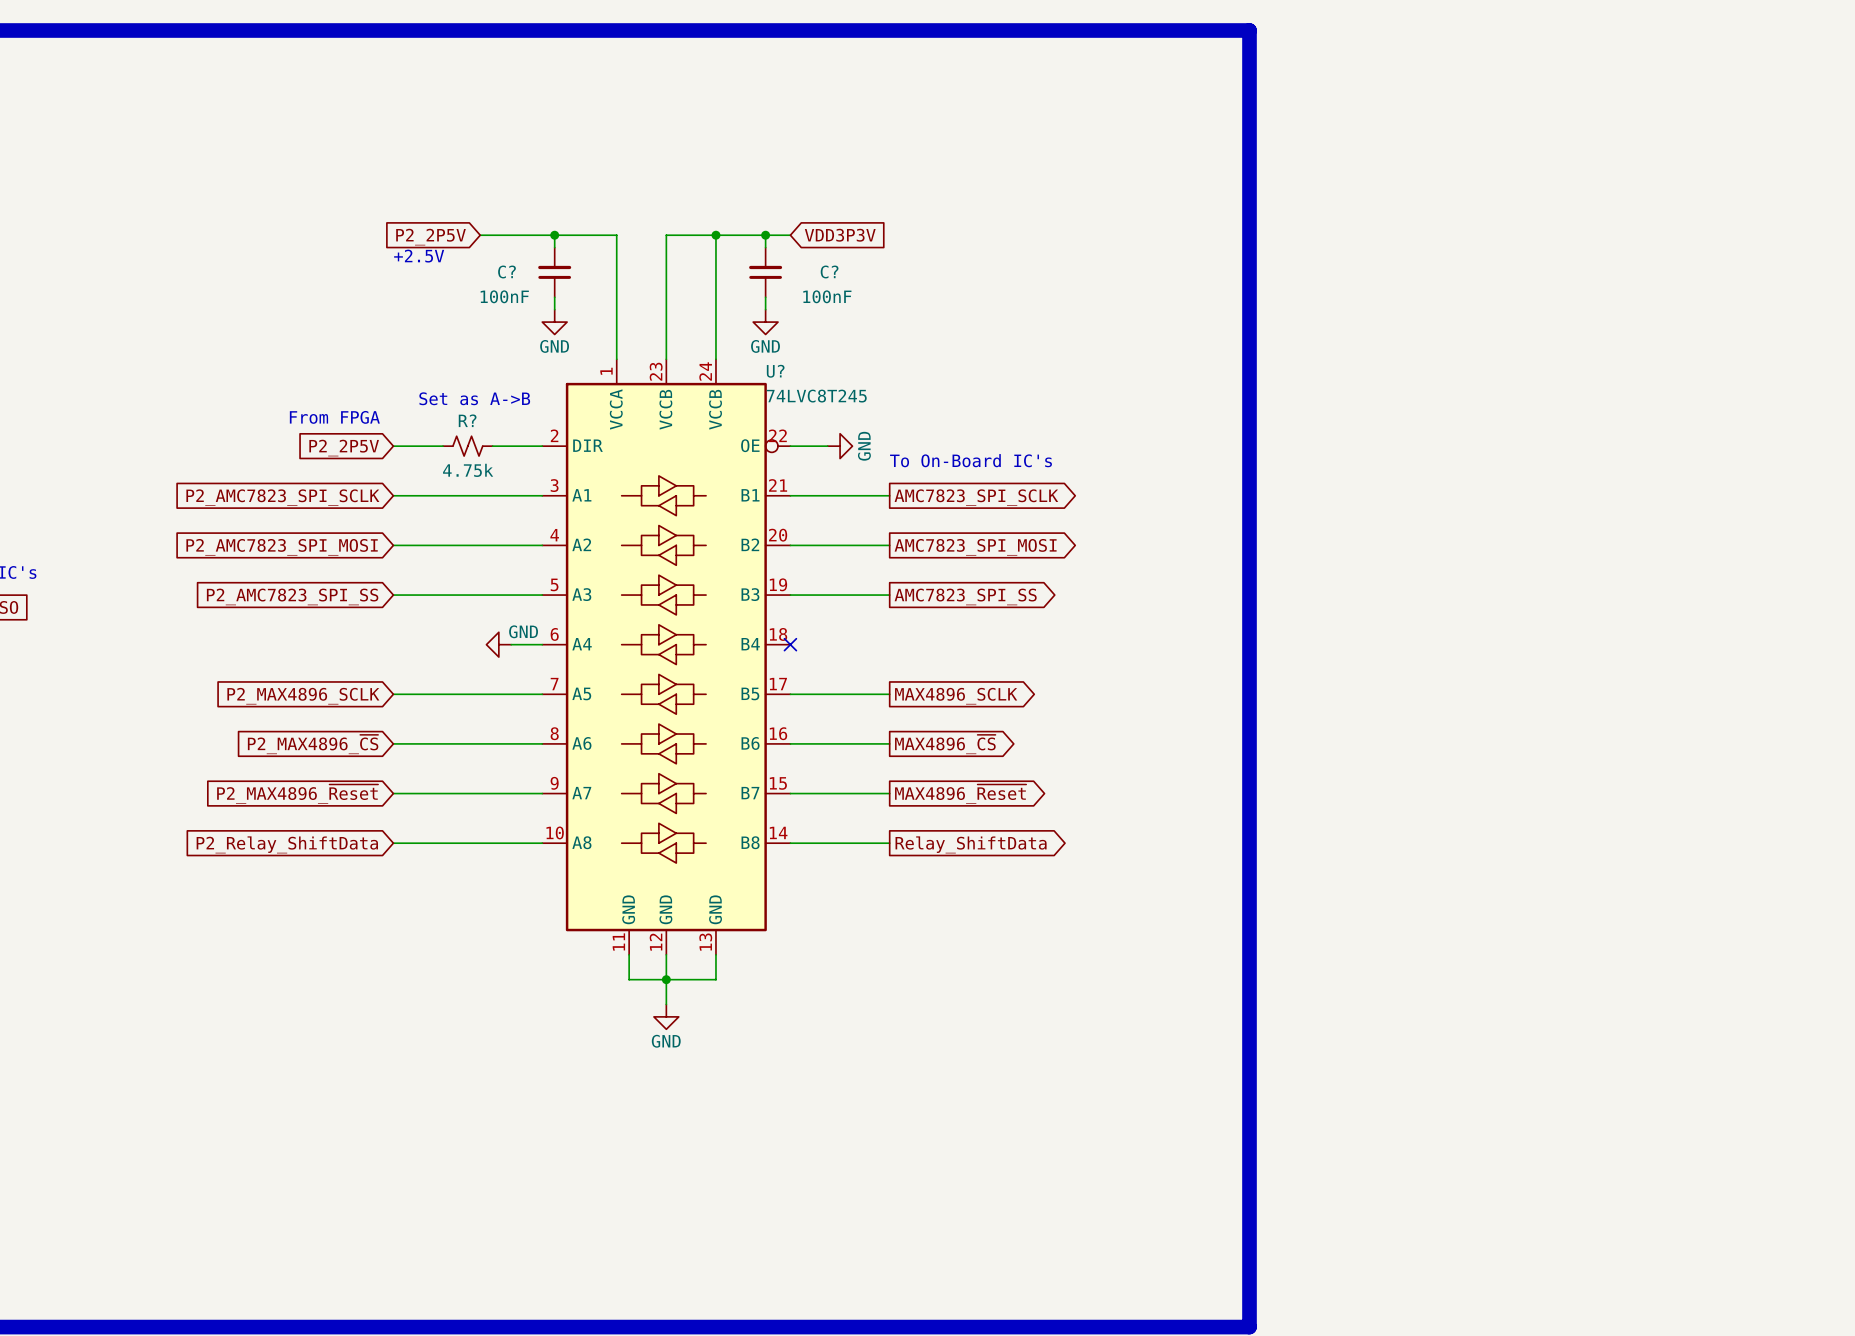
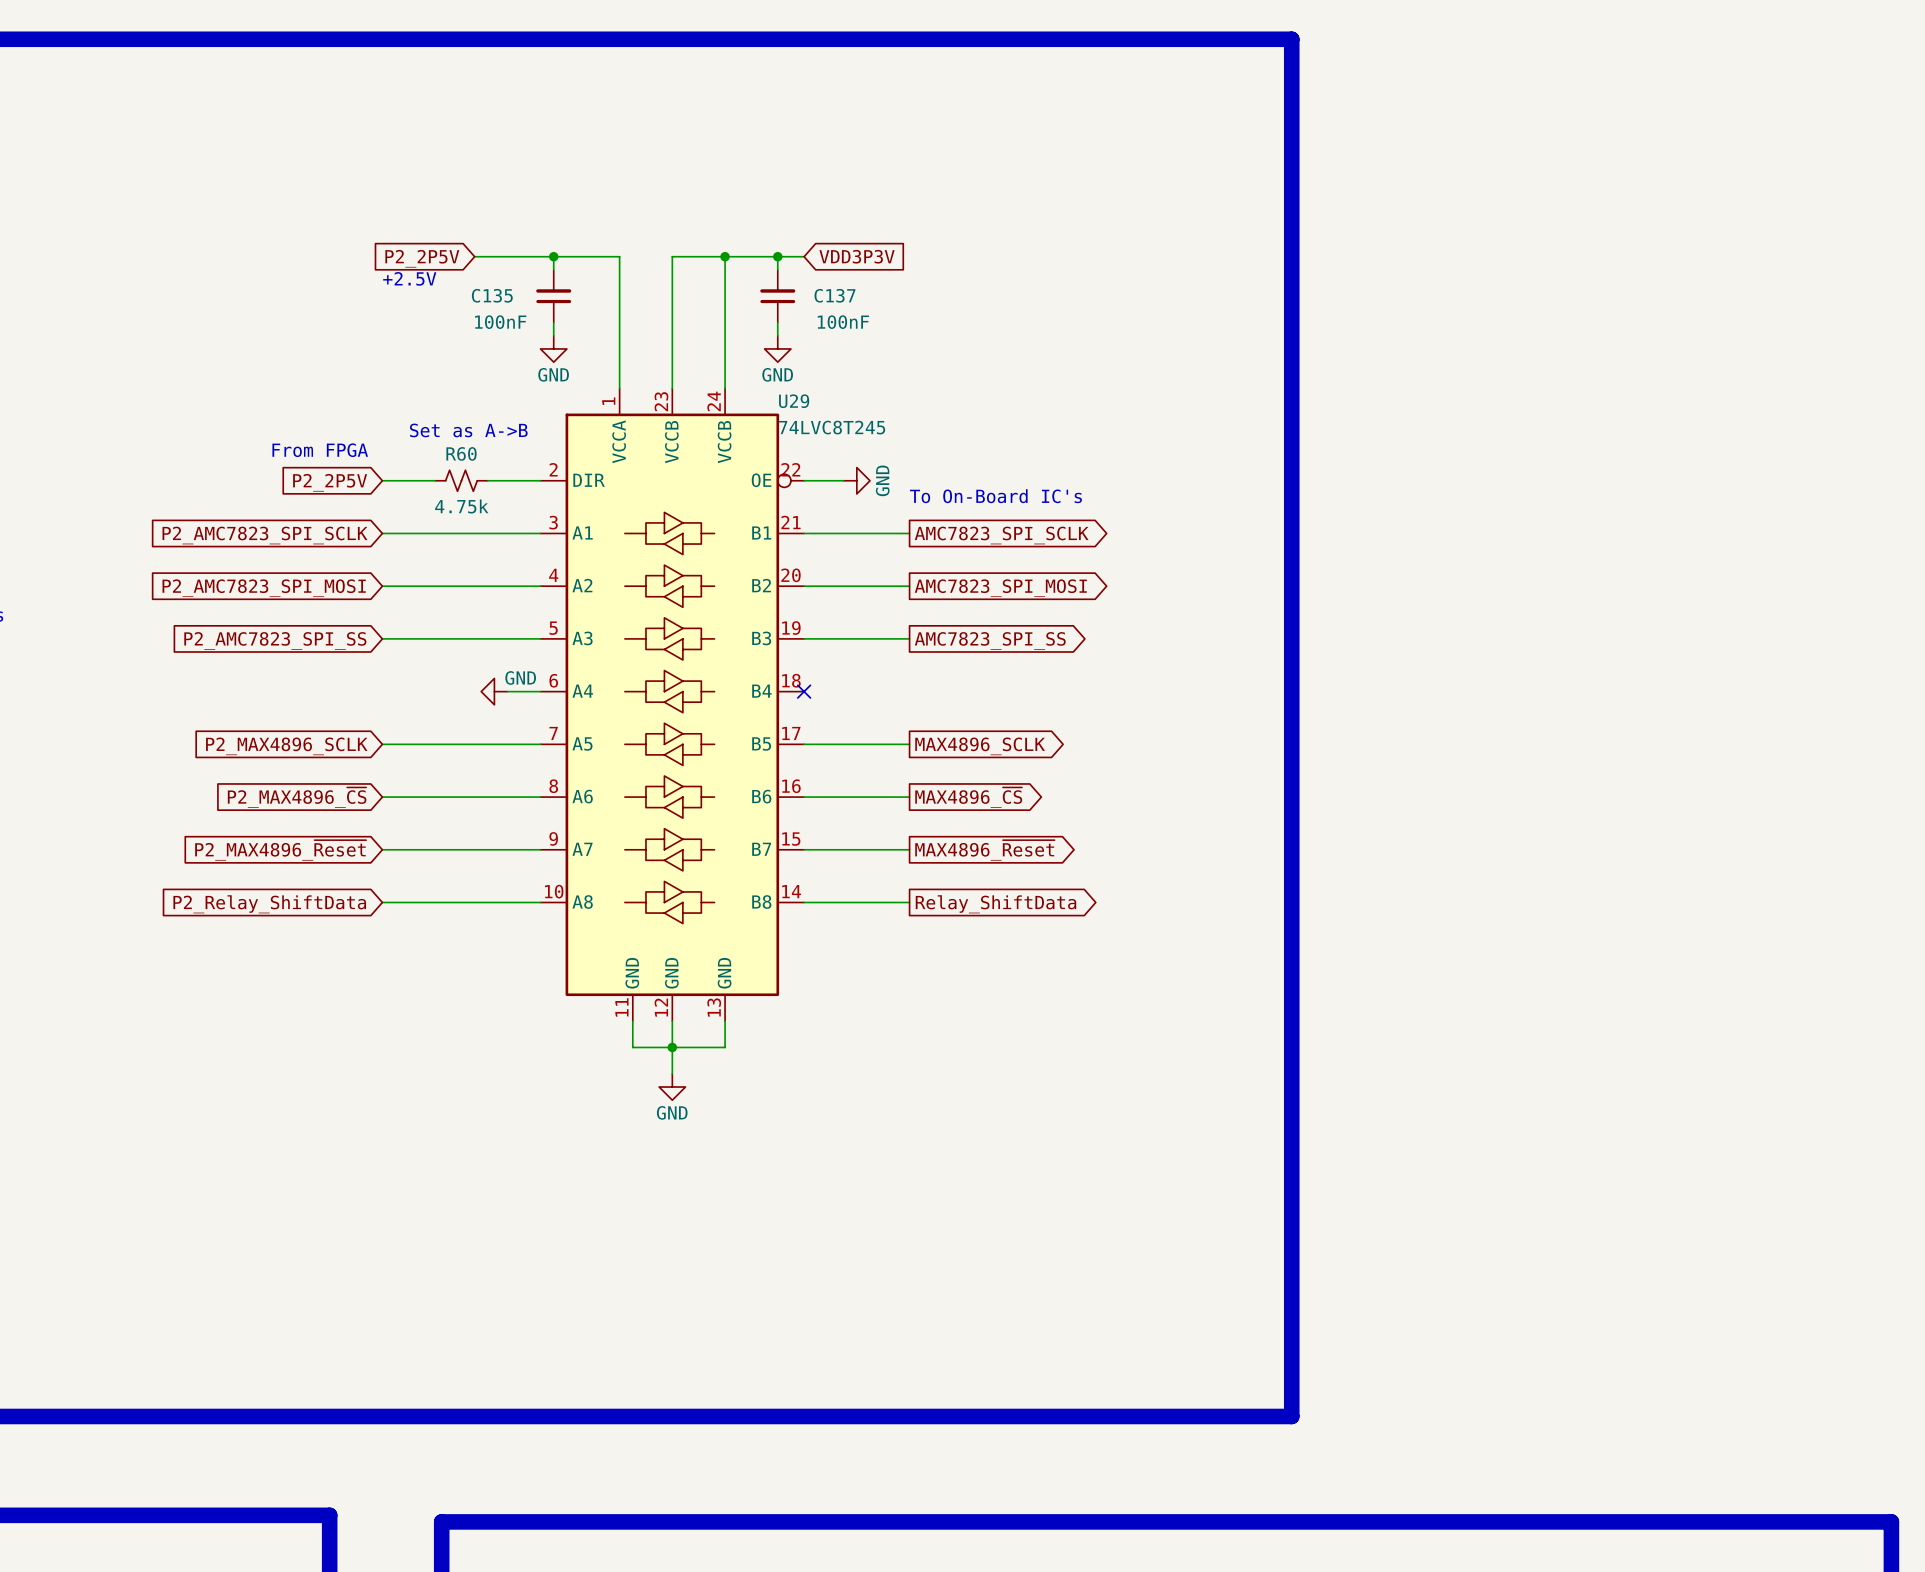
C? name: C? (506, 271) -> C135 (492, 295)
C? name: C? (829, 271) -> C137 (835, 295)
U? name: U? (775, 371) -> U29 (794, 401)
R? name: R? (467, 420) -> R60 (461, 453)

